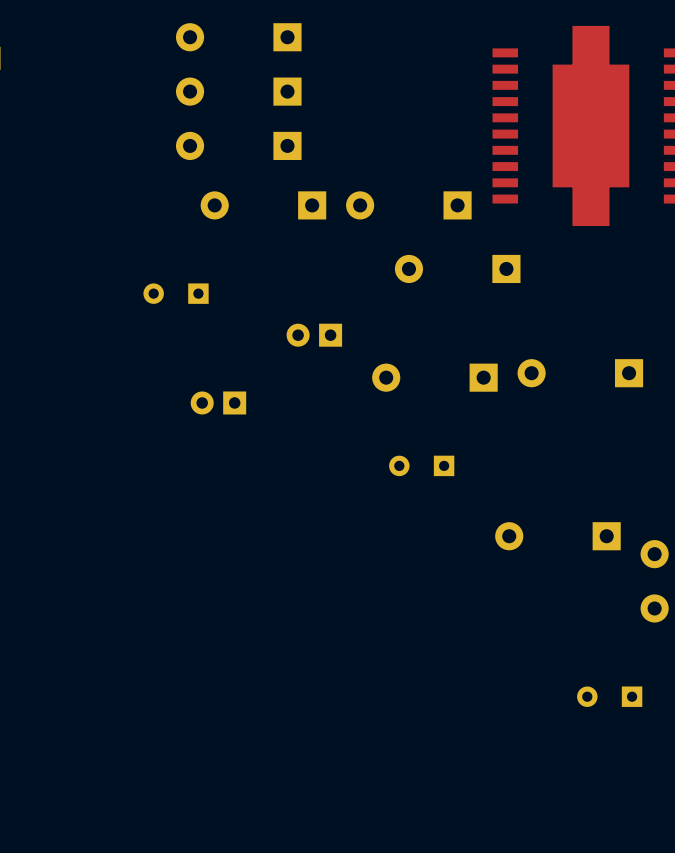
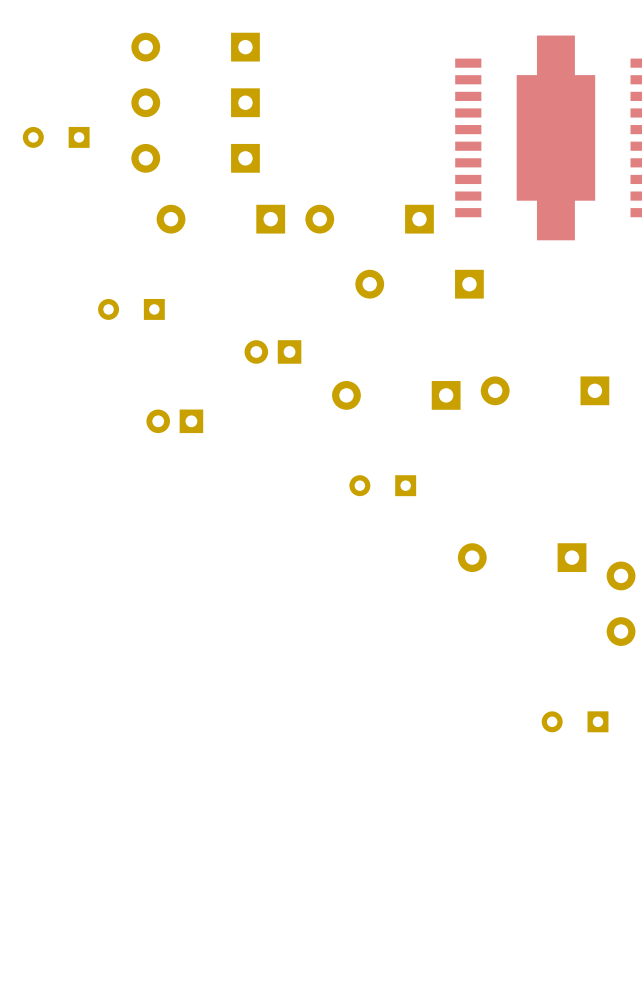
part: none -> (56, 137)

